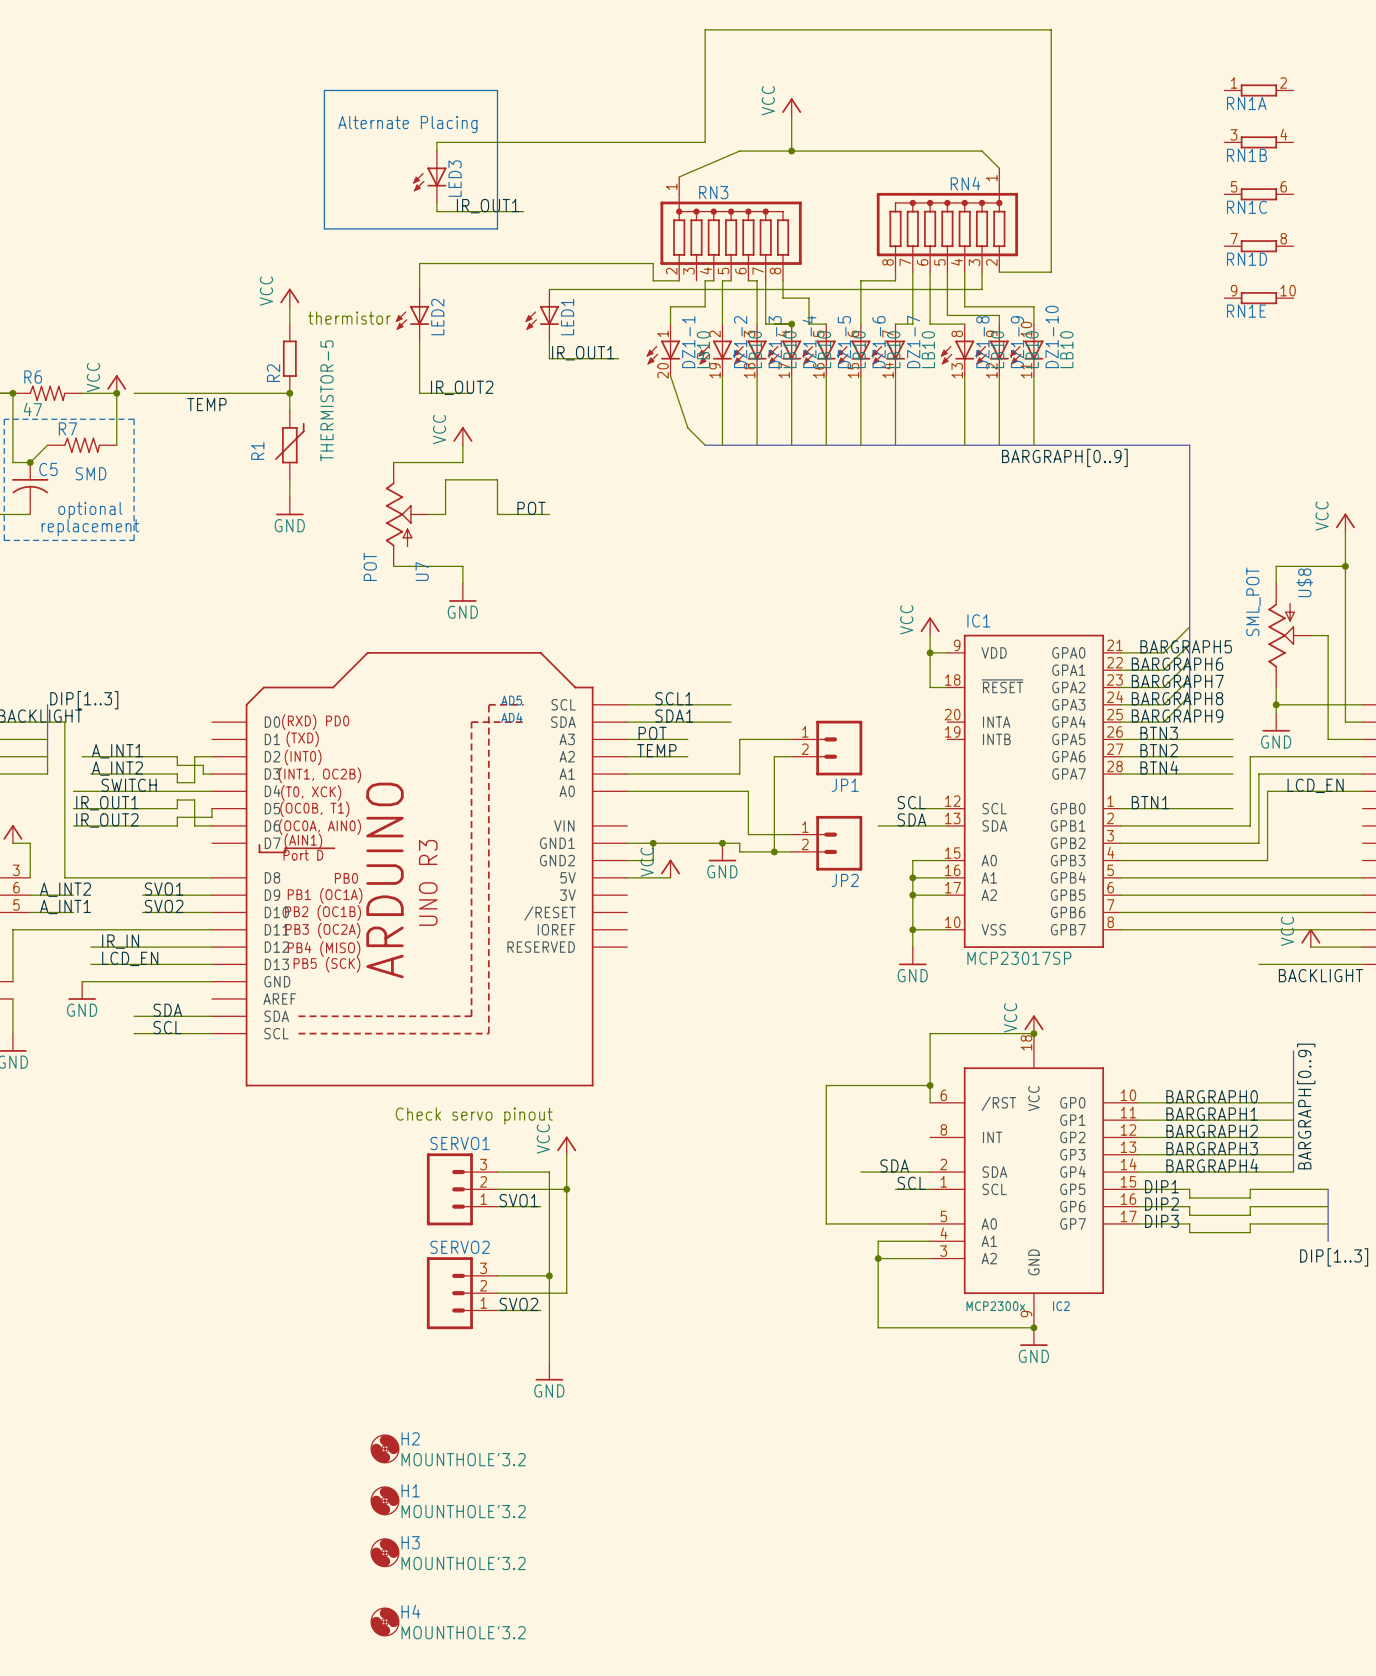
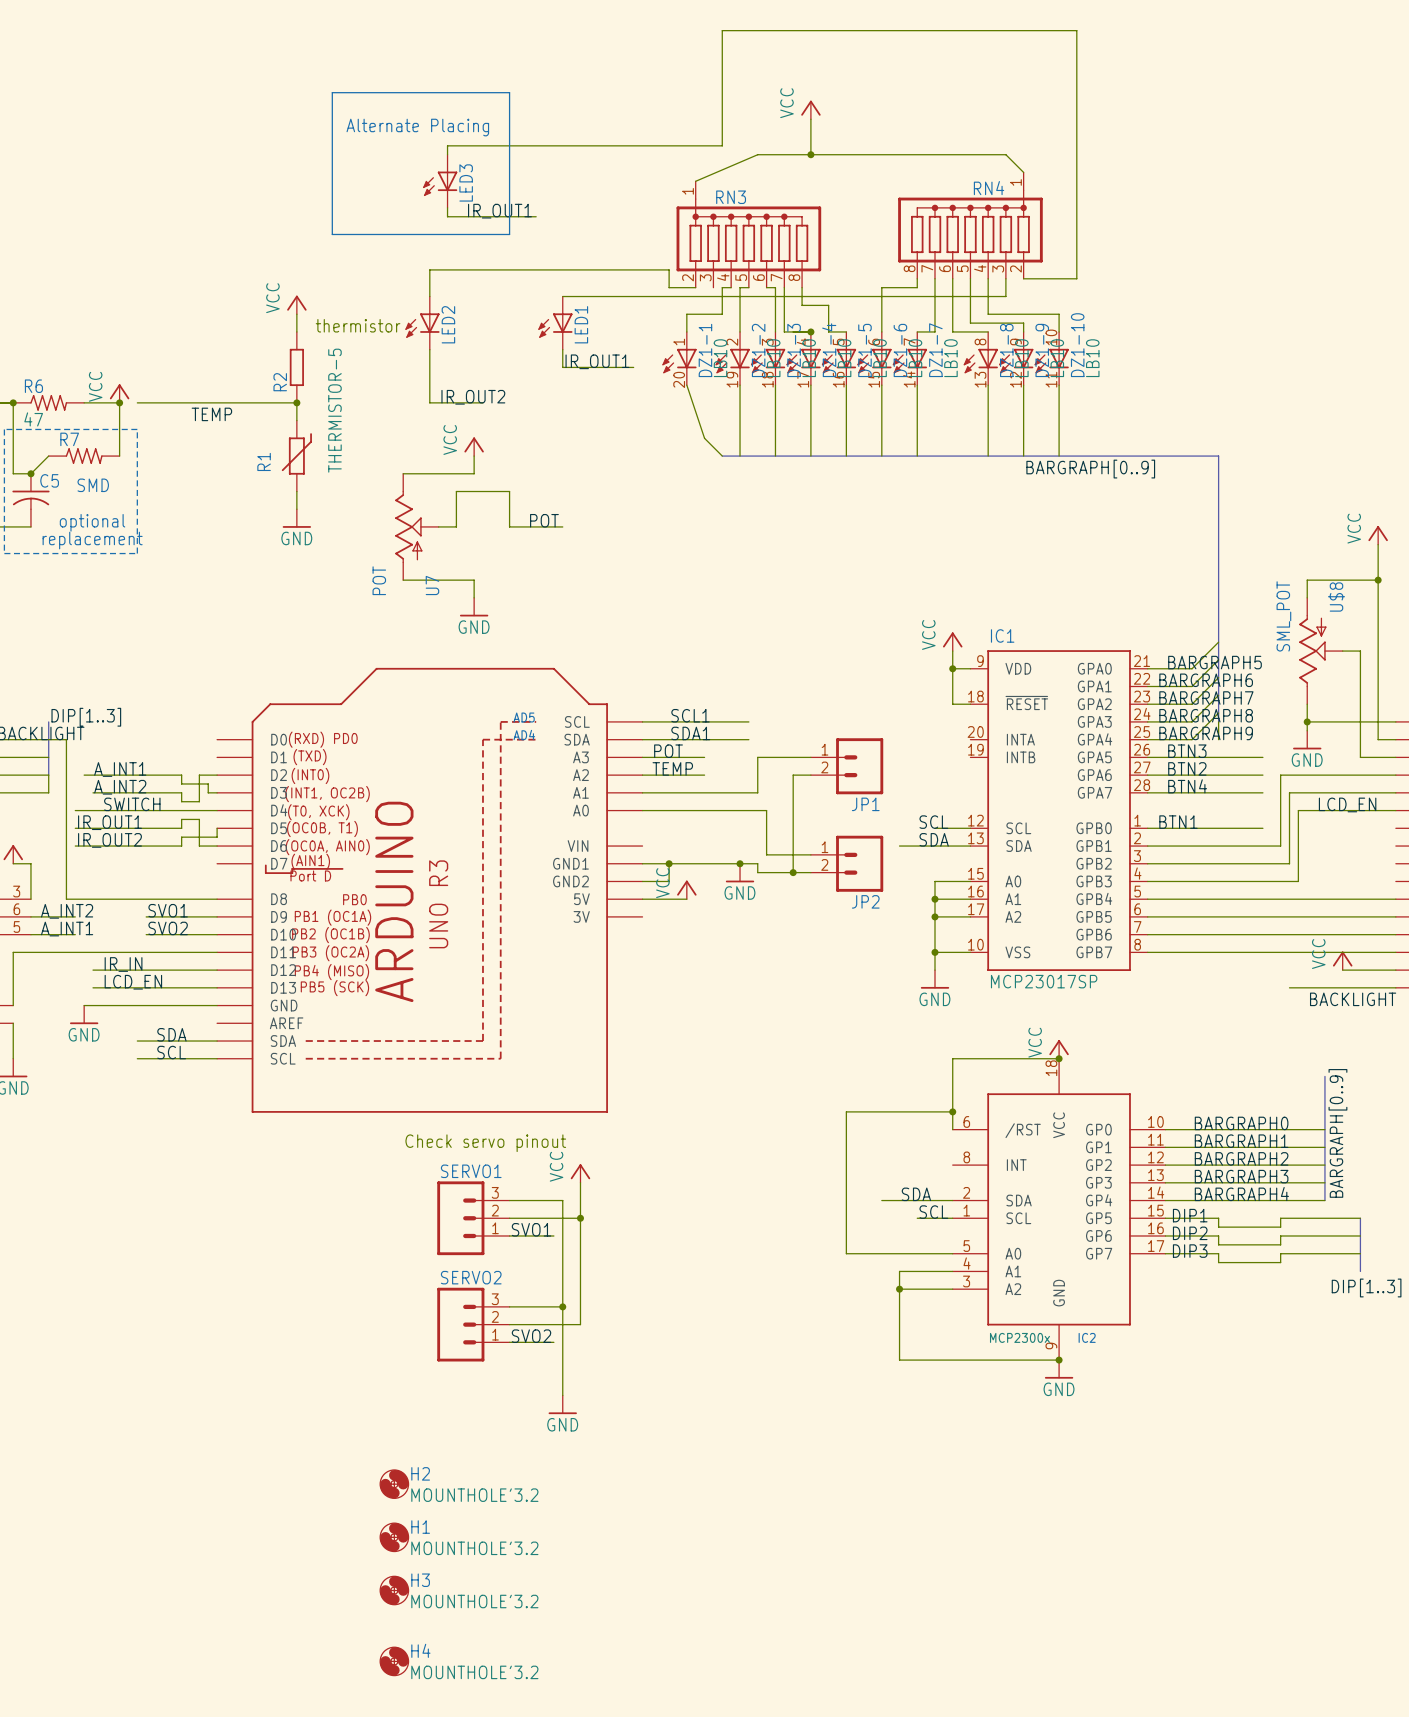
RN1A: (1258, 90) -> none
RN1B: (1258, 142) -> none
RN1C: (1258, 194) -> none
RN1D: (1258, 246) -> none
RN1E: (1258, 298) -> none
part symbol: [211, 652, 628, 1087] -> [217, 667, 643, 1113]

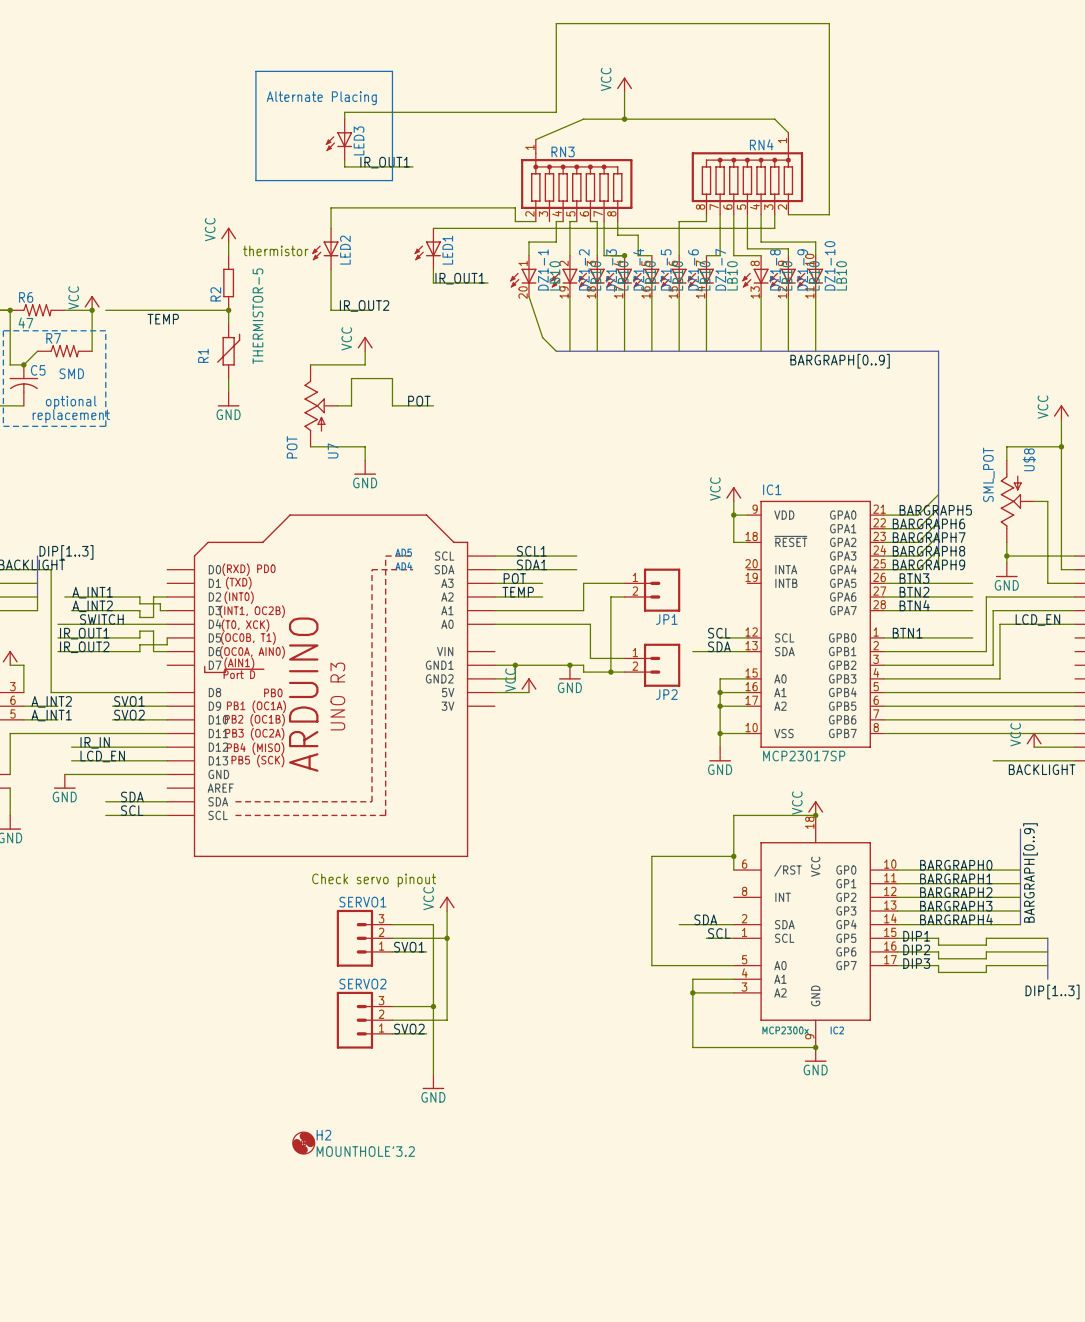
H1: MOUNTHOLE'3.2 (394, 1537) -> none
H3: MOUNTHOLE'3.2 (394, 1590) -> none
H4: MOUNTHOLE'3.2 (394, 1661) -> none

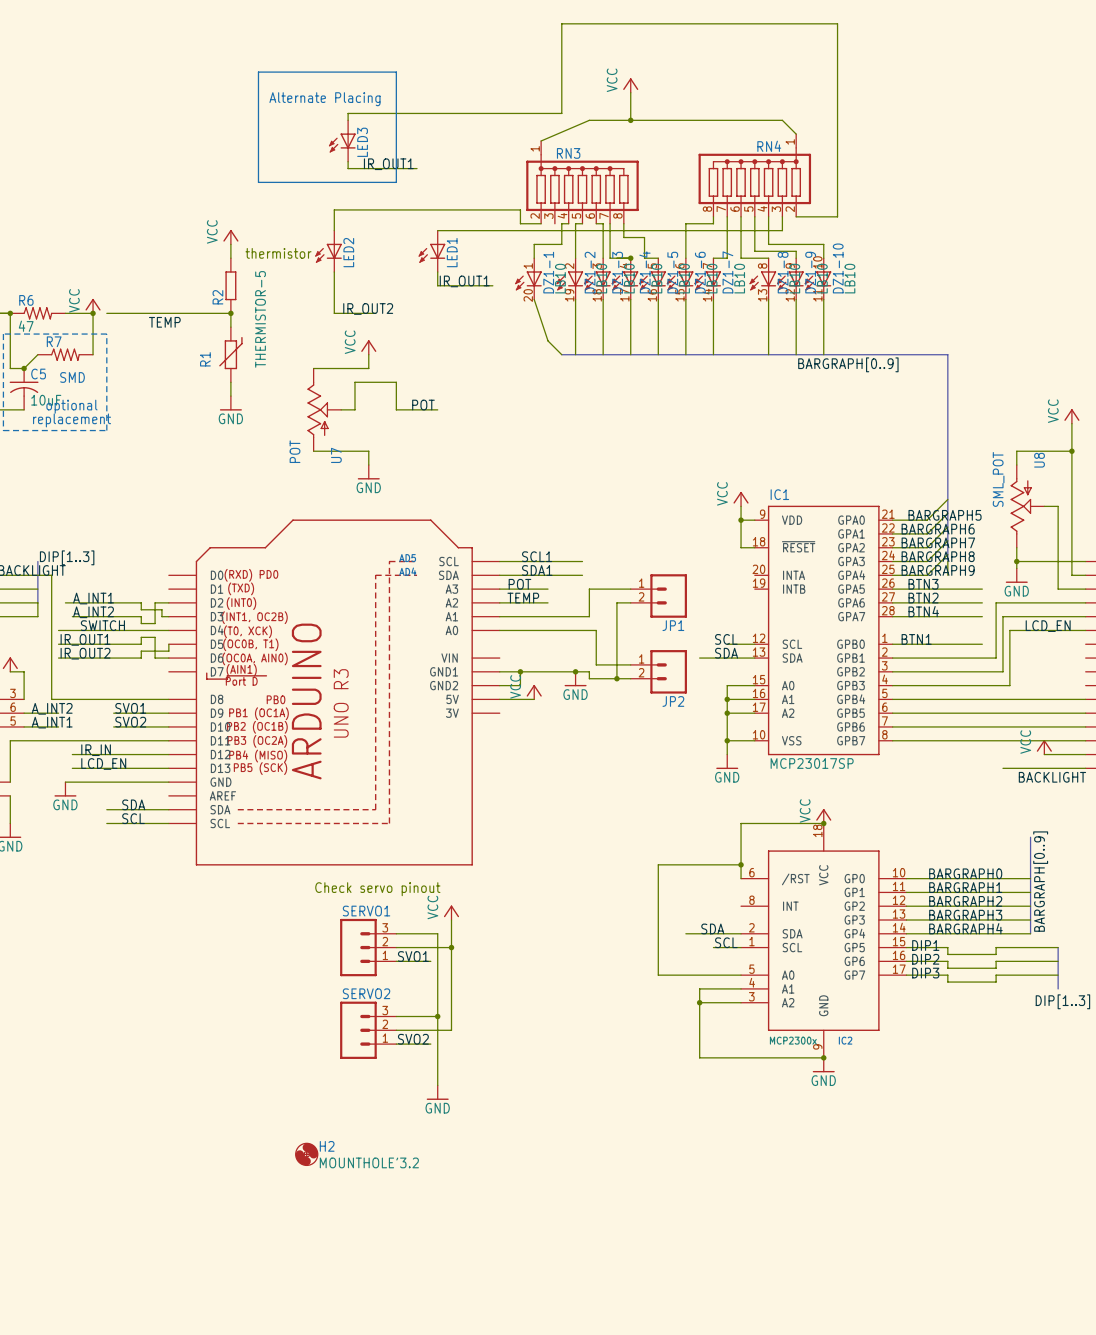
C5 value: none -> 10uF (46, 400)
U$8 name: U$8 (1029, 459) -> U8 (1039, 460)

